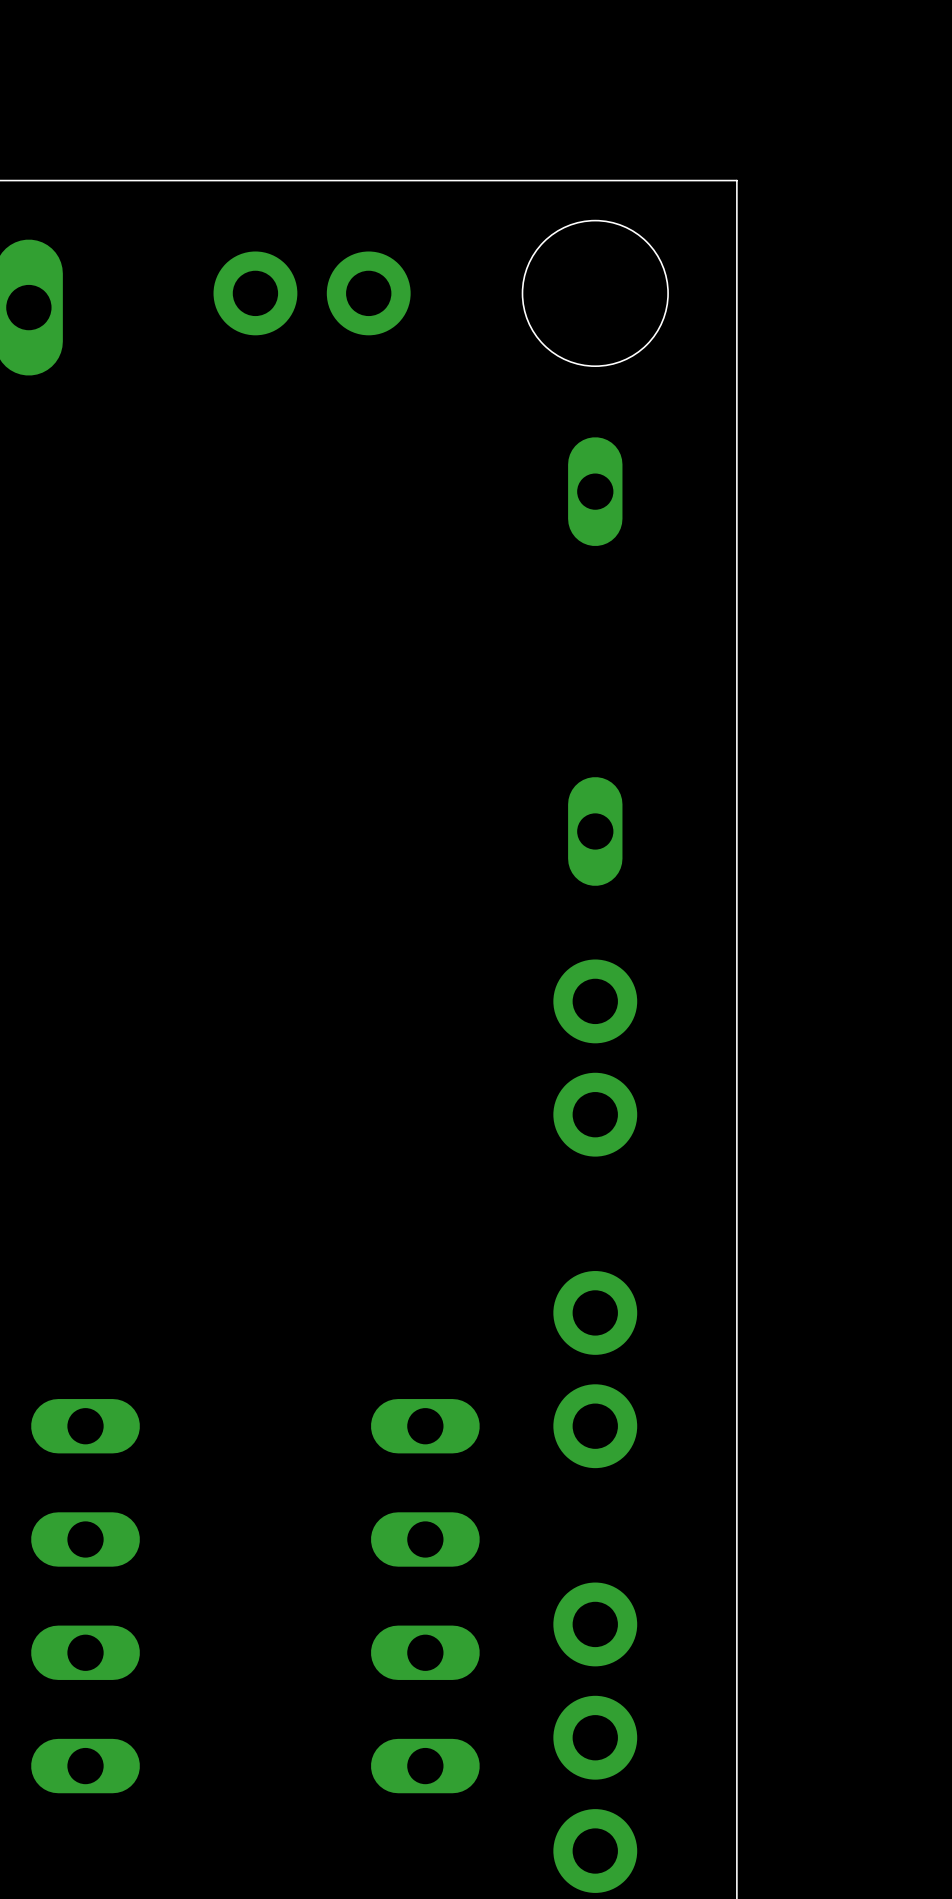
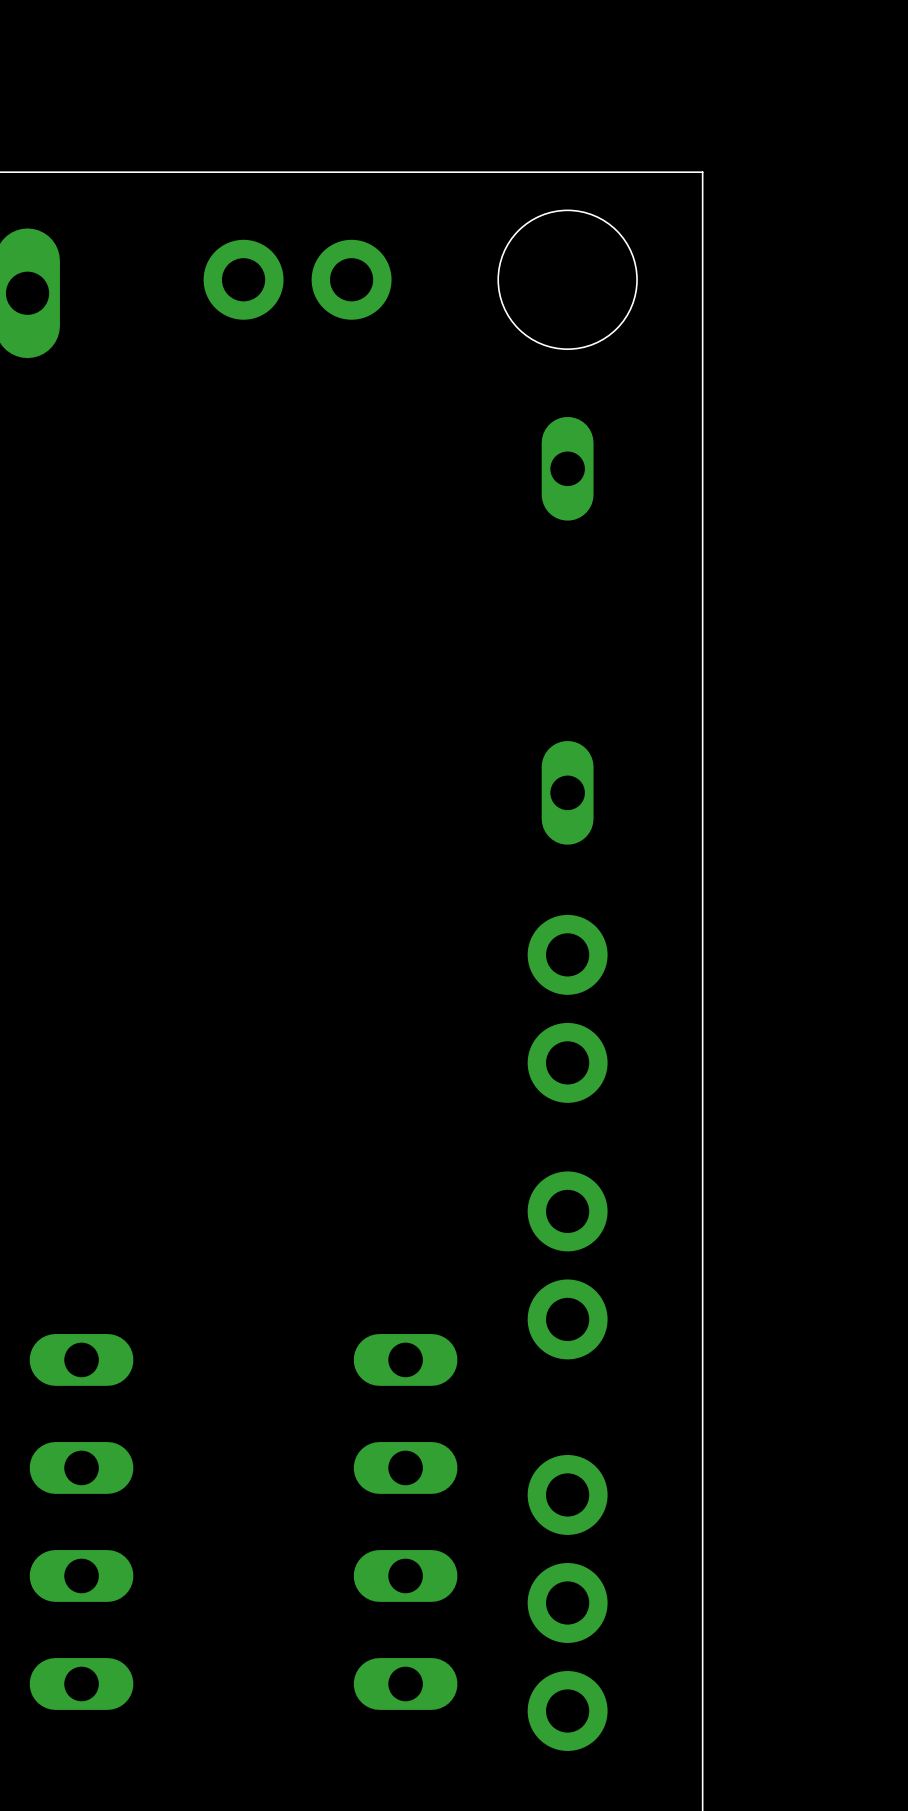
part position: (595, 1369) -> (567, 1265)
part position: (595, 1737) -> (567, 1602)

